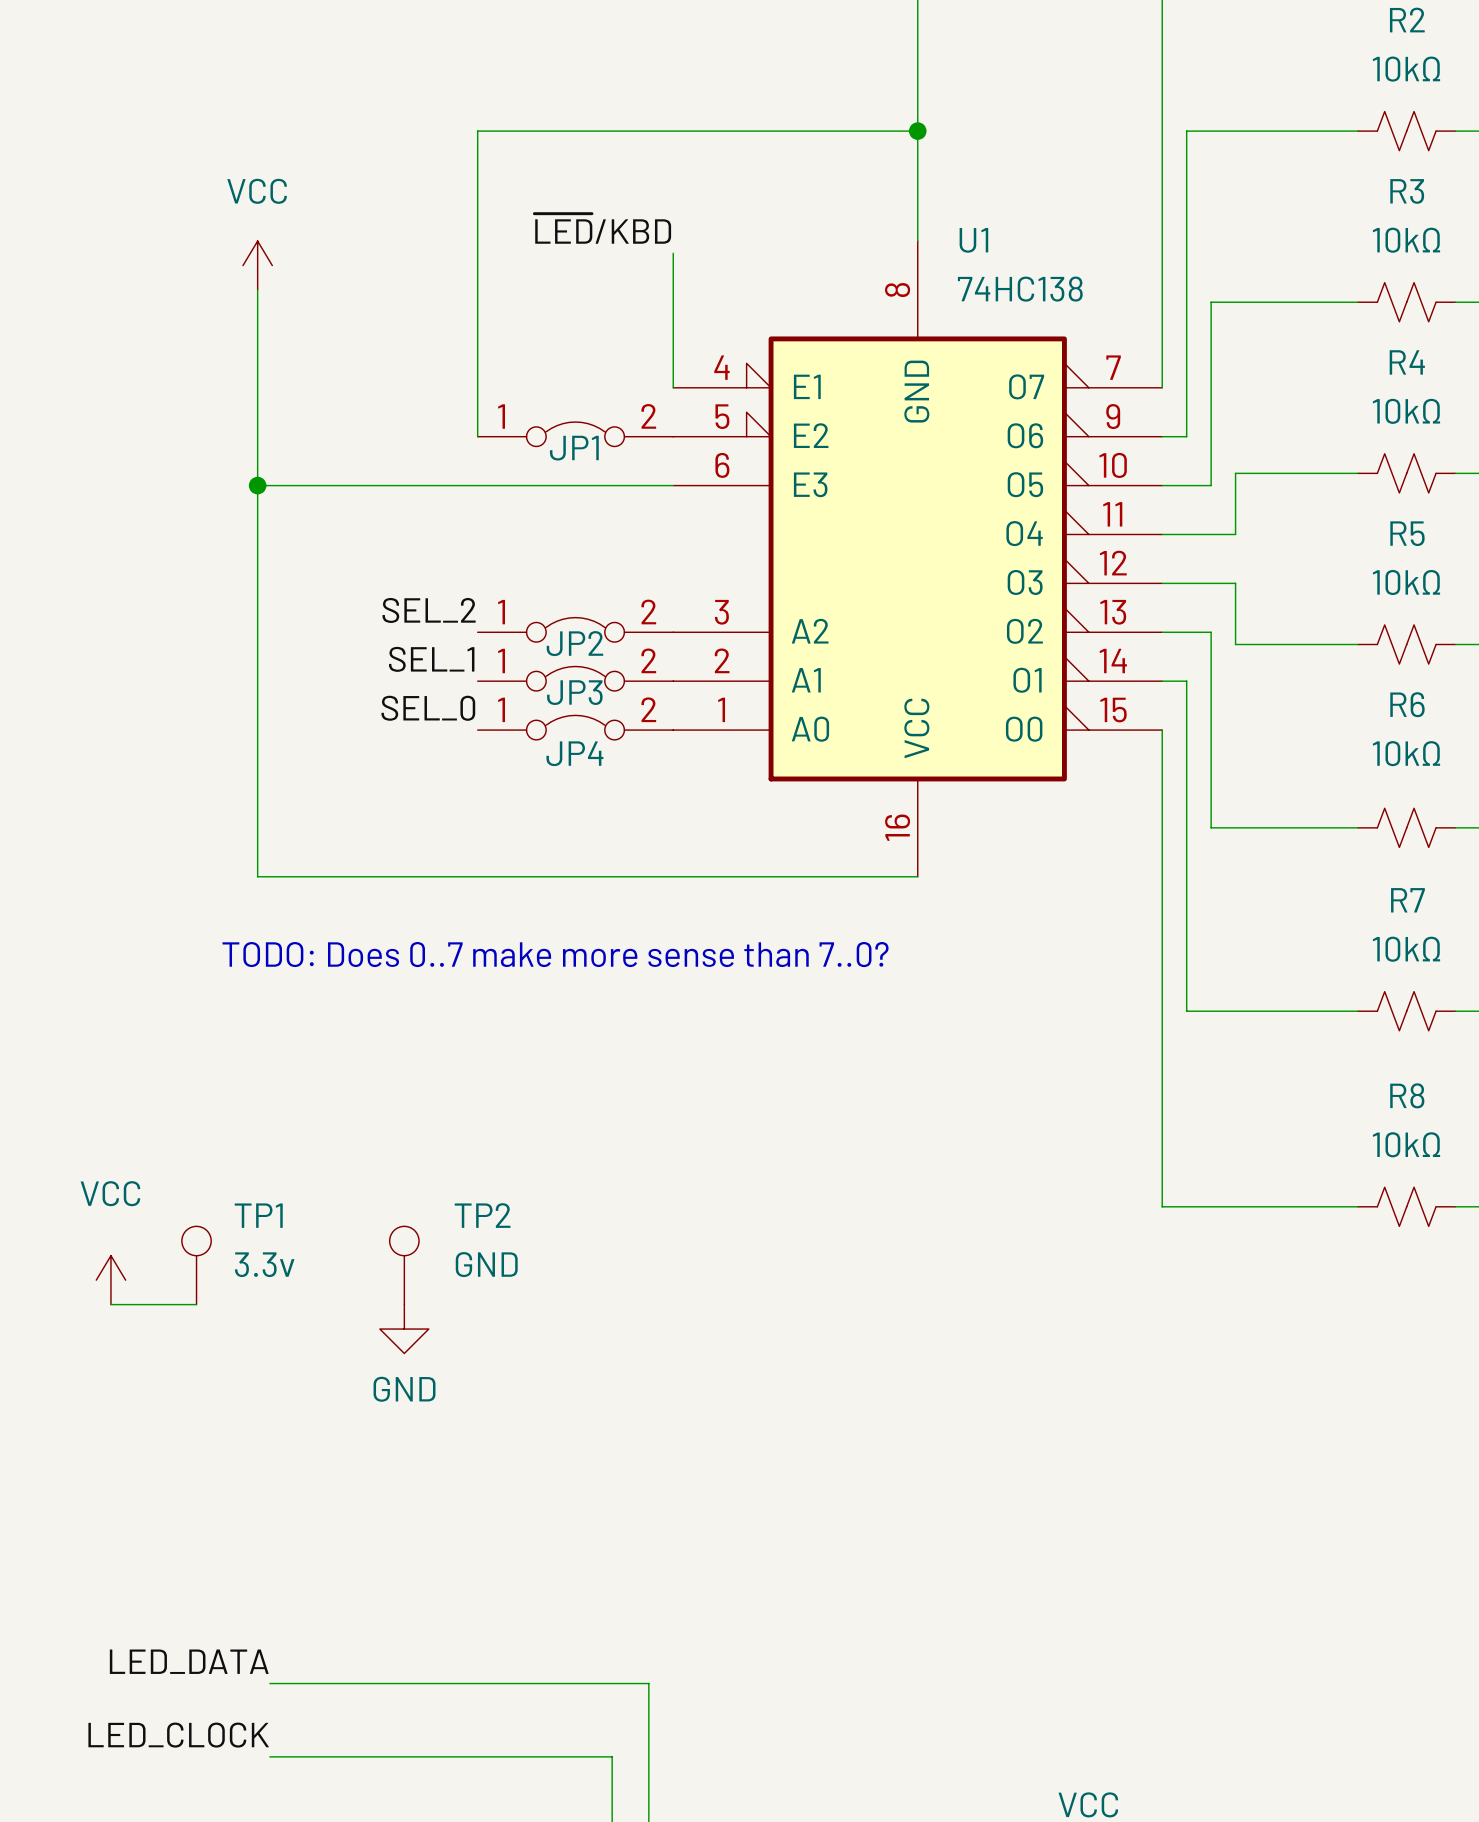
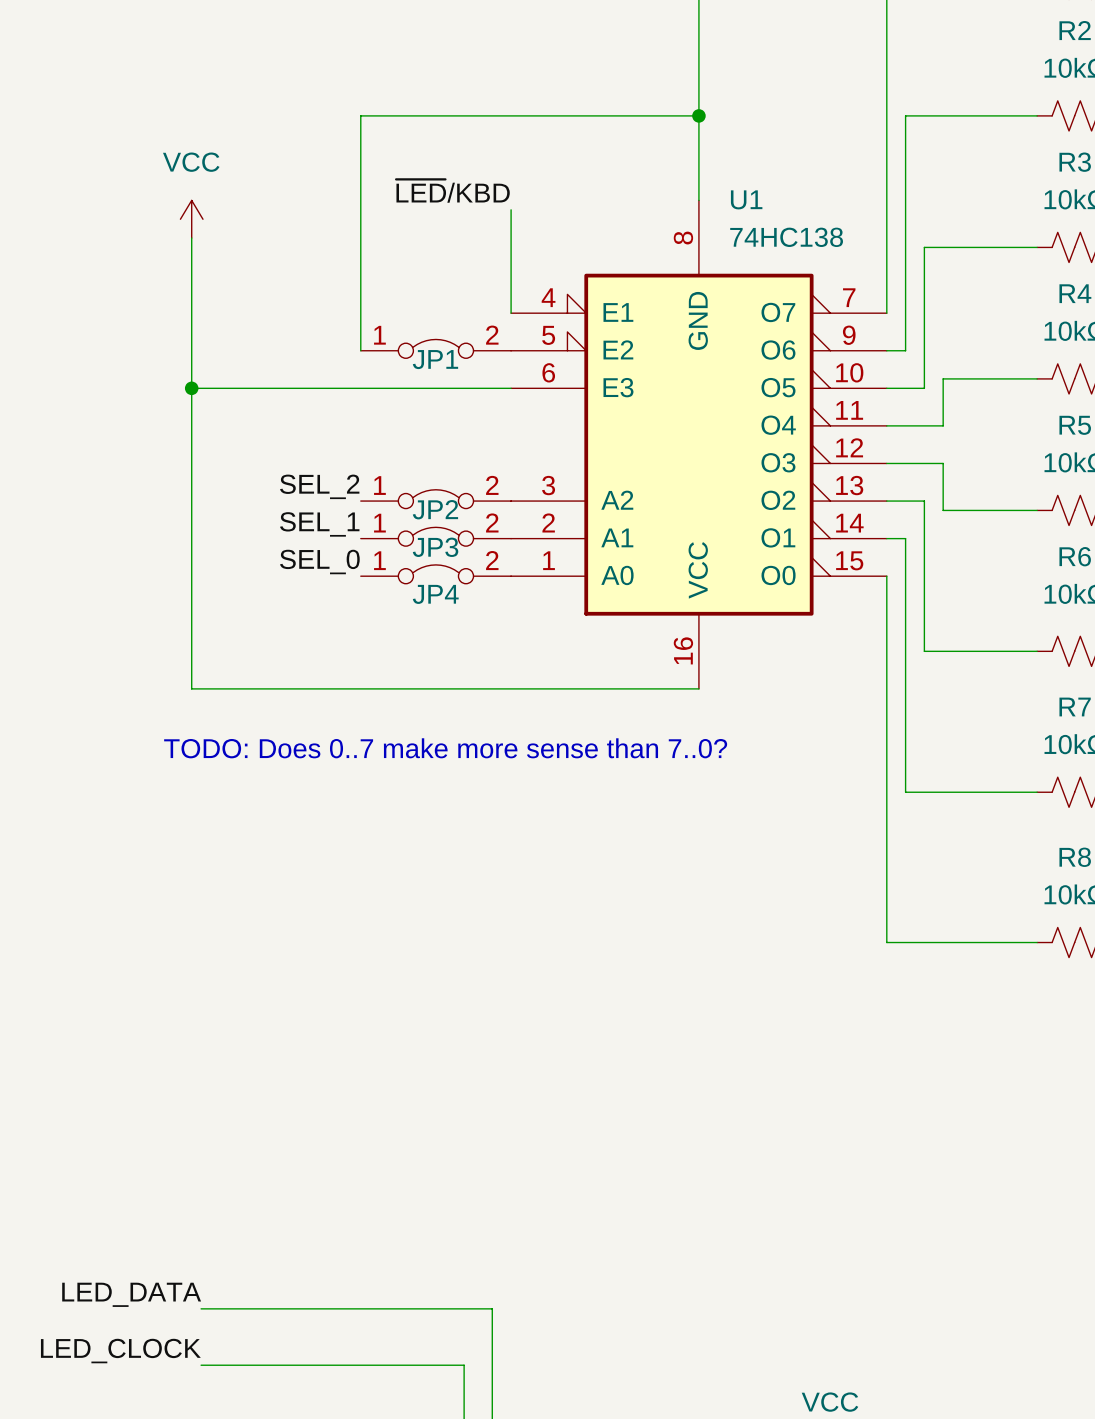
TP1: 3.3v (196, 1265) -> none
TP2: GND (404, 1265) -> none
power symbol: VCC (110, 1280) -> none
wire: (110, 1304) (196, 1304) -> none
power symbol: GND (404, 1329) -> none

